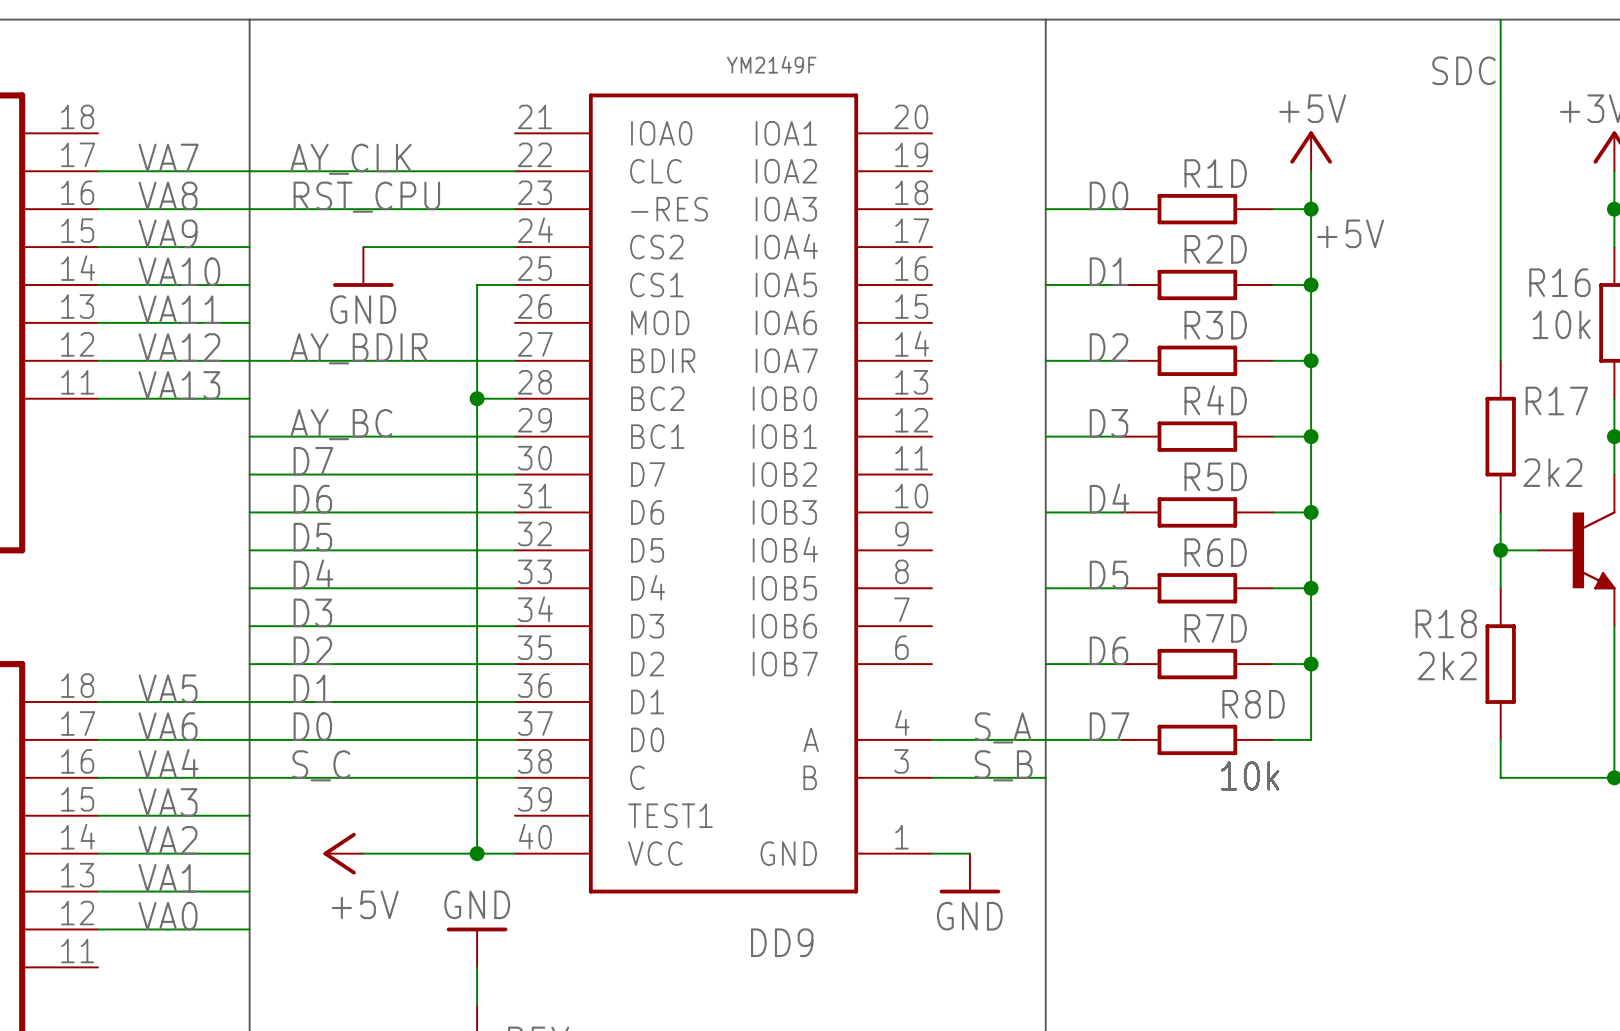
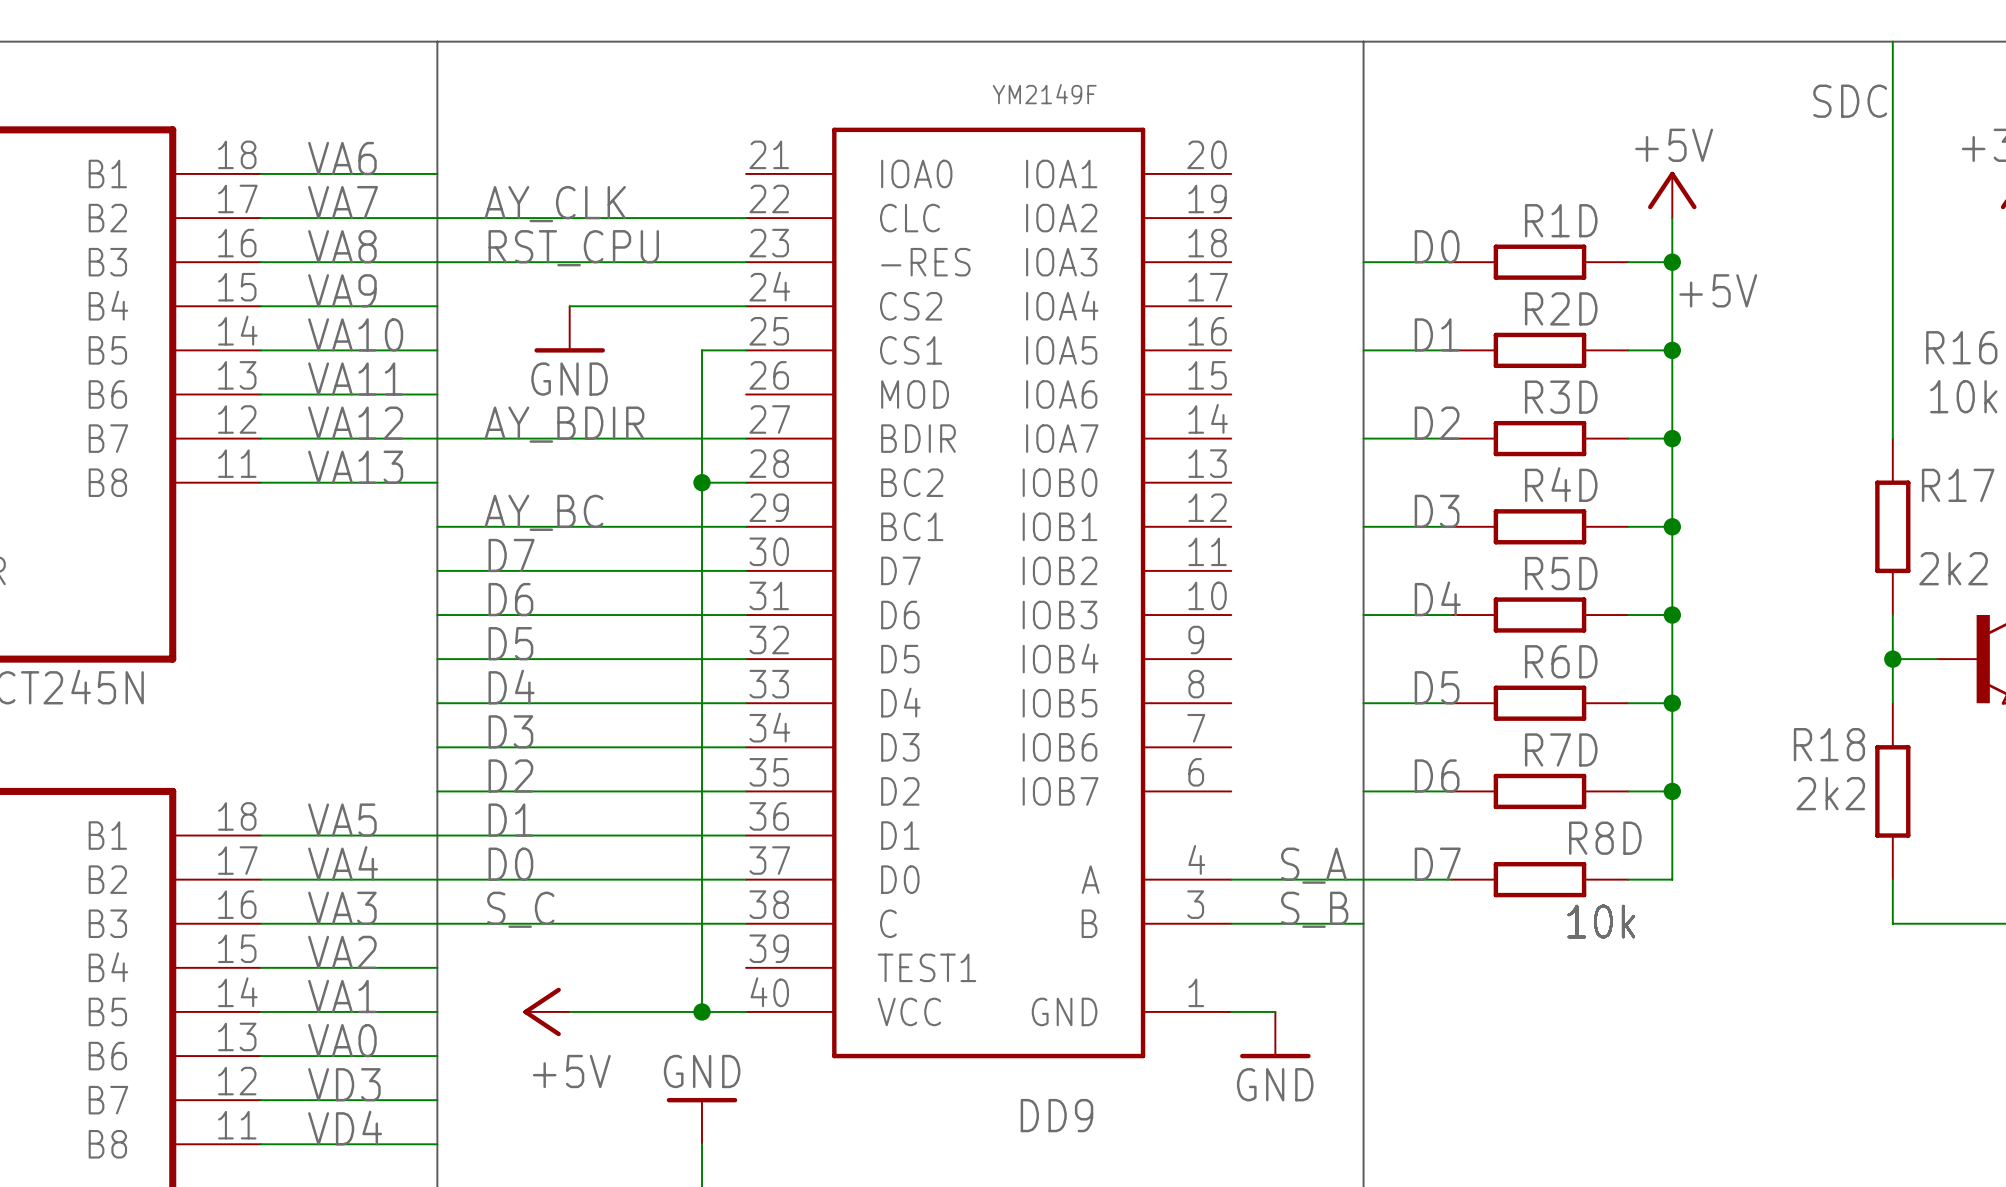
label: none -> VA6 (342, 158)
wire: none -> (260, 173) (437, 173)
label: VA6 (168, 726) -> VA4 (343, 863)
label: VA4 (168, 763) -> VA3 (342, 908)
label: VA3 (168, 802) -> VA2 (342, 952)
label: VA2 (168, 840) -> VA1 (342, 996)
label: VA1 (168, 878) -> VA0 (342, 1040)
label: VA0 (168, 916) -> VD3 (344, 1084)
label: none -> VD4 (345, 1128)
wire: none -> (260, 1144) (437, 1144)

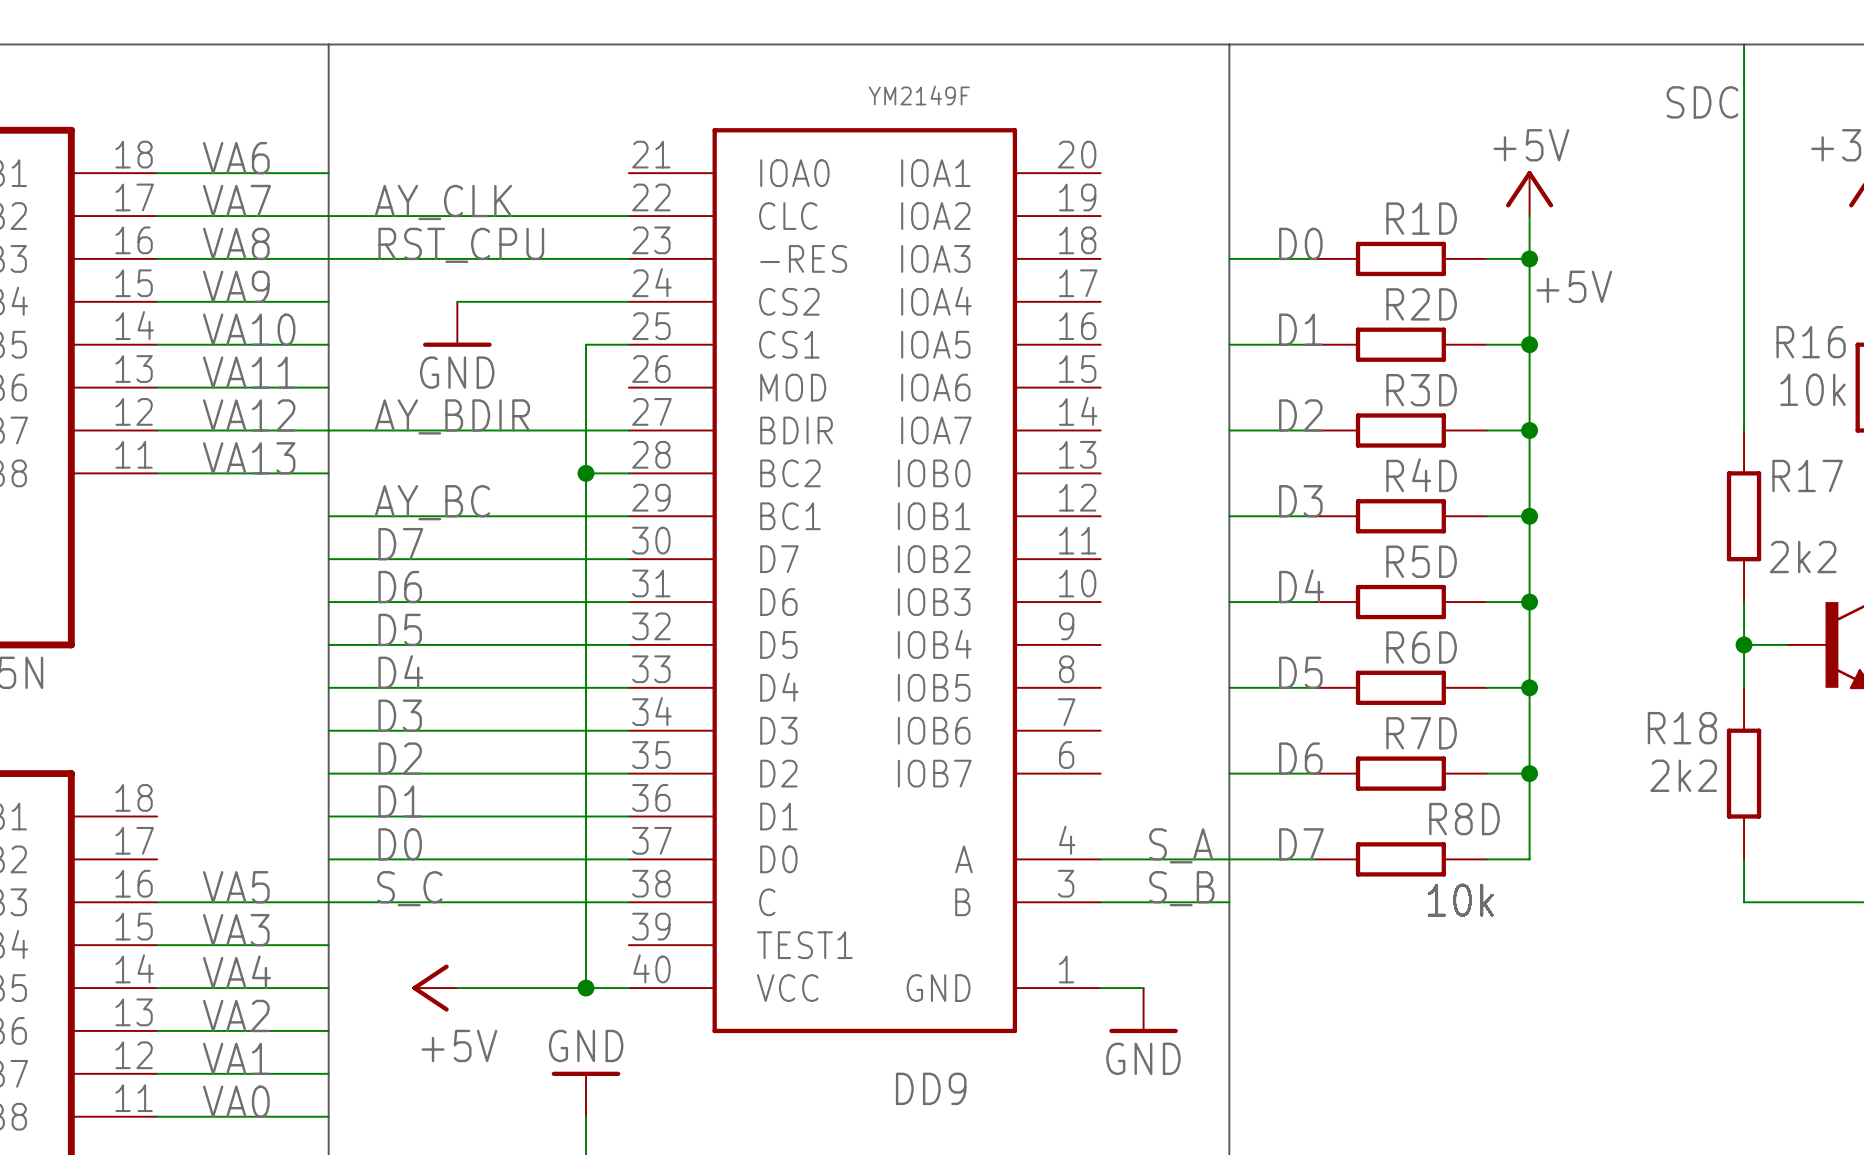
label: VA5 (342, 820) -> none
wire: (260, 835) (437, 835) -> none
label: VA4 (343, 863) -> none
wire: (260, 879) (437, 879) -> none
label: VA3 (342, 908) -> VA5 (236, 887)
label: VA2 (342, 952) -> VA3 (236, 930)
label: VA1 (342, 996) -> VA4 (236, 972)
label: VA0 (342, 1040) -> VA2 (236, 1015)
label: VD3 (344, 1084) -> VA1 (236, 1058)
label: VD4 (345, 1128) -> VA0 (236, 1101)

